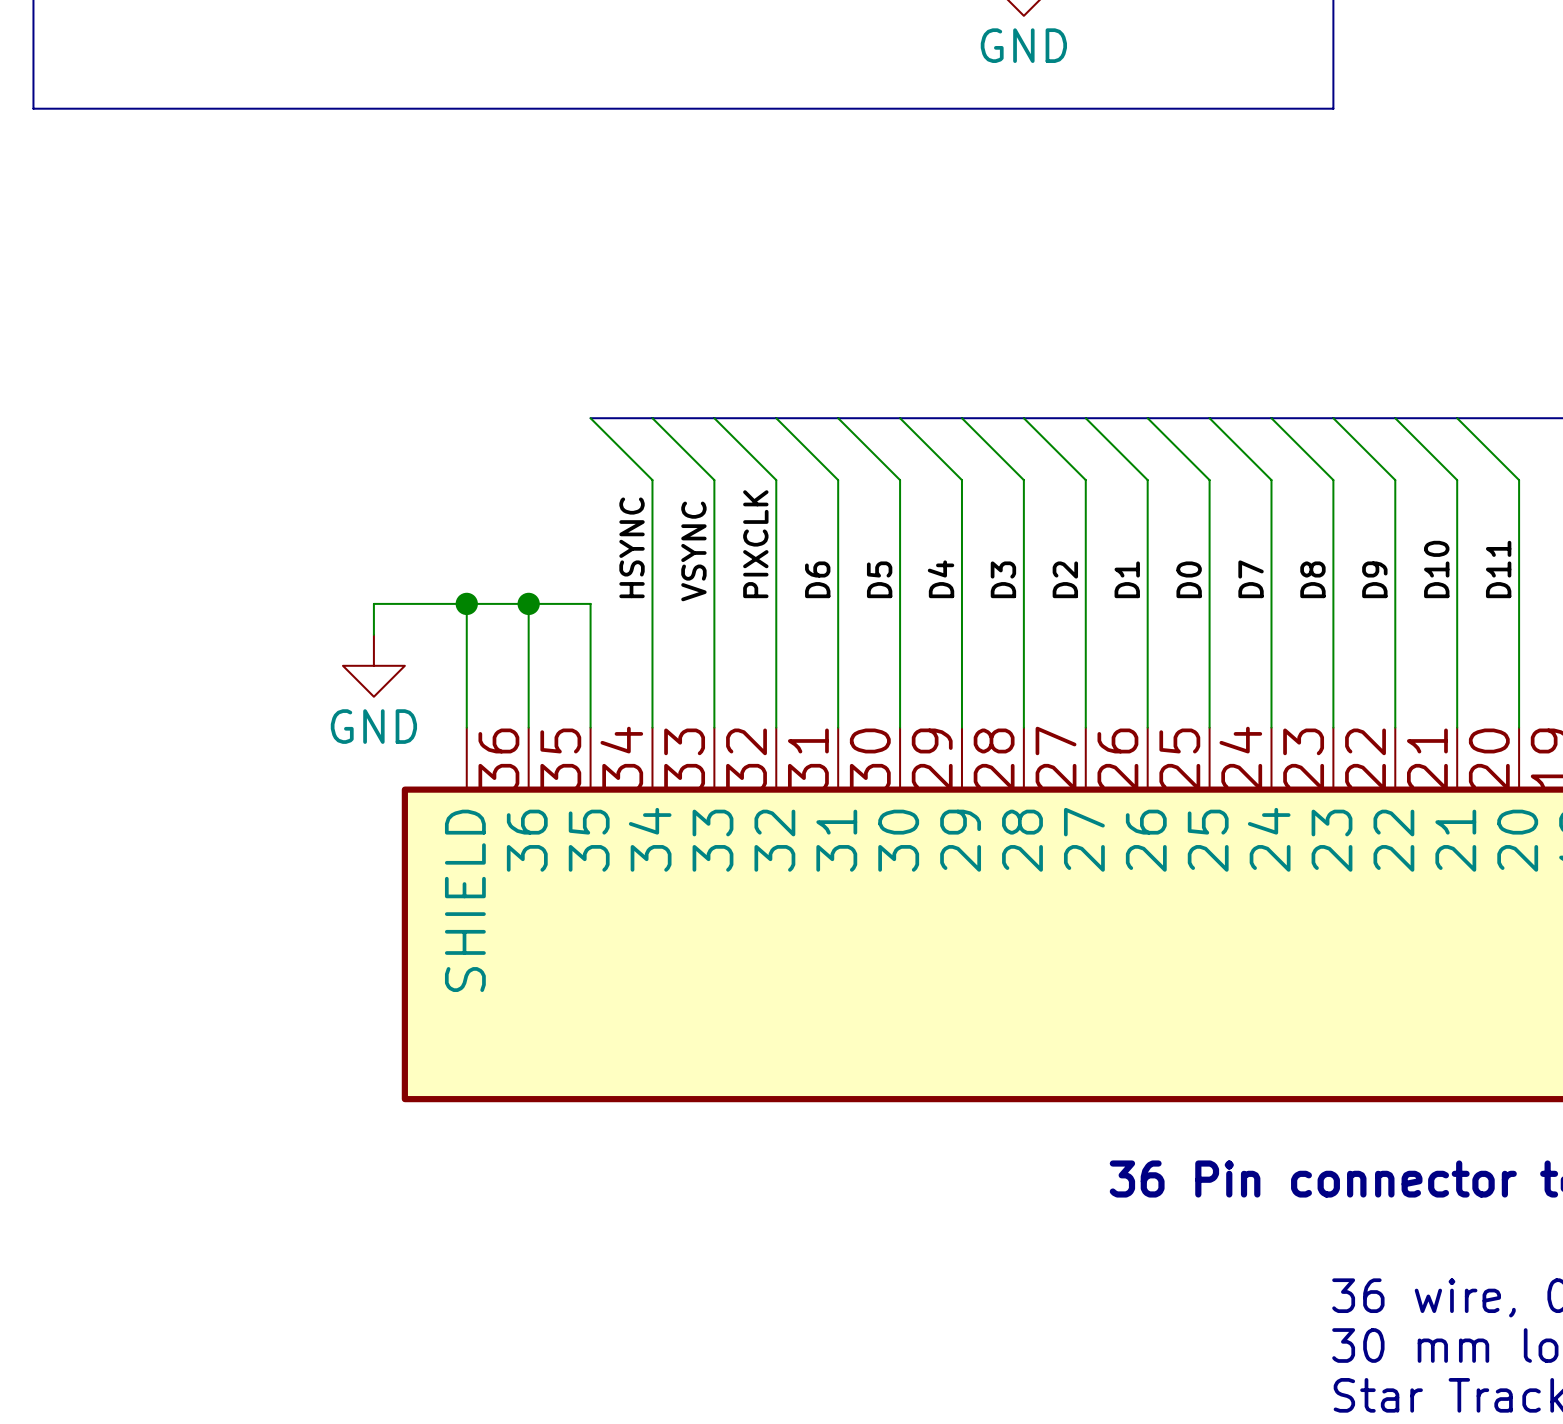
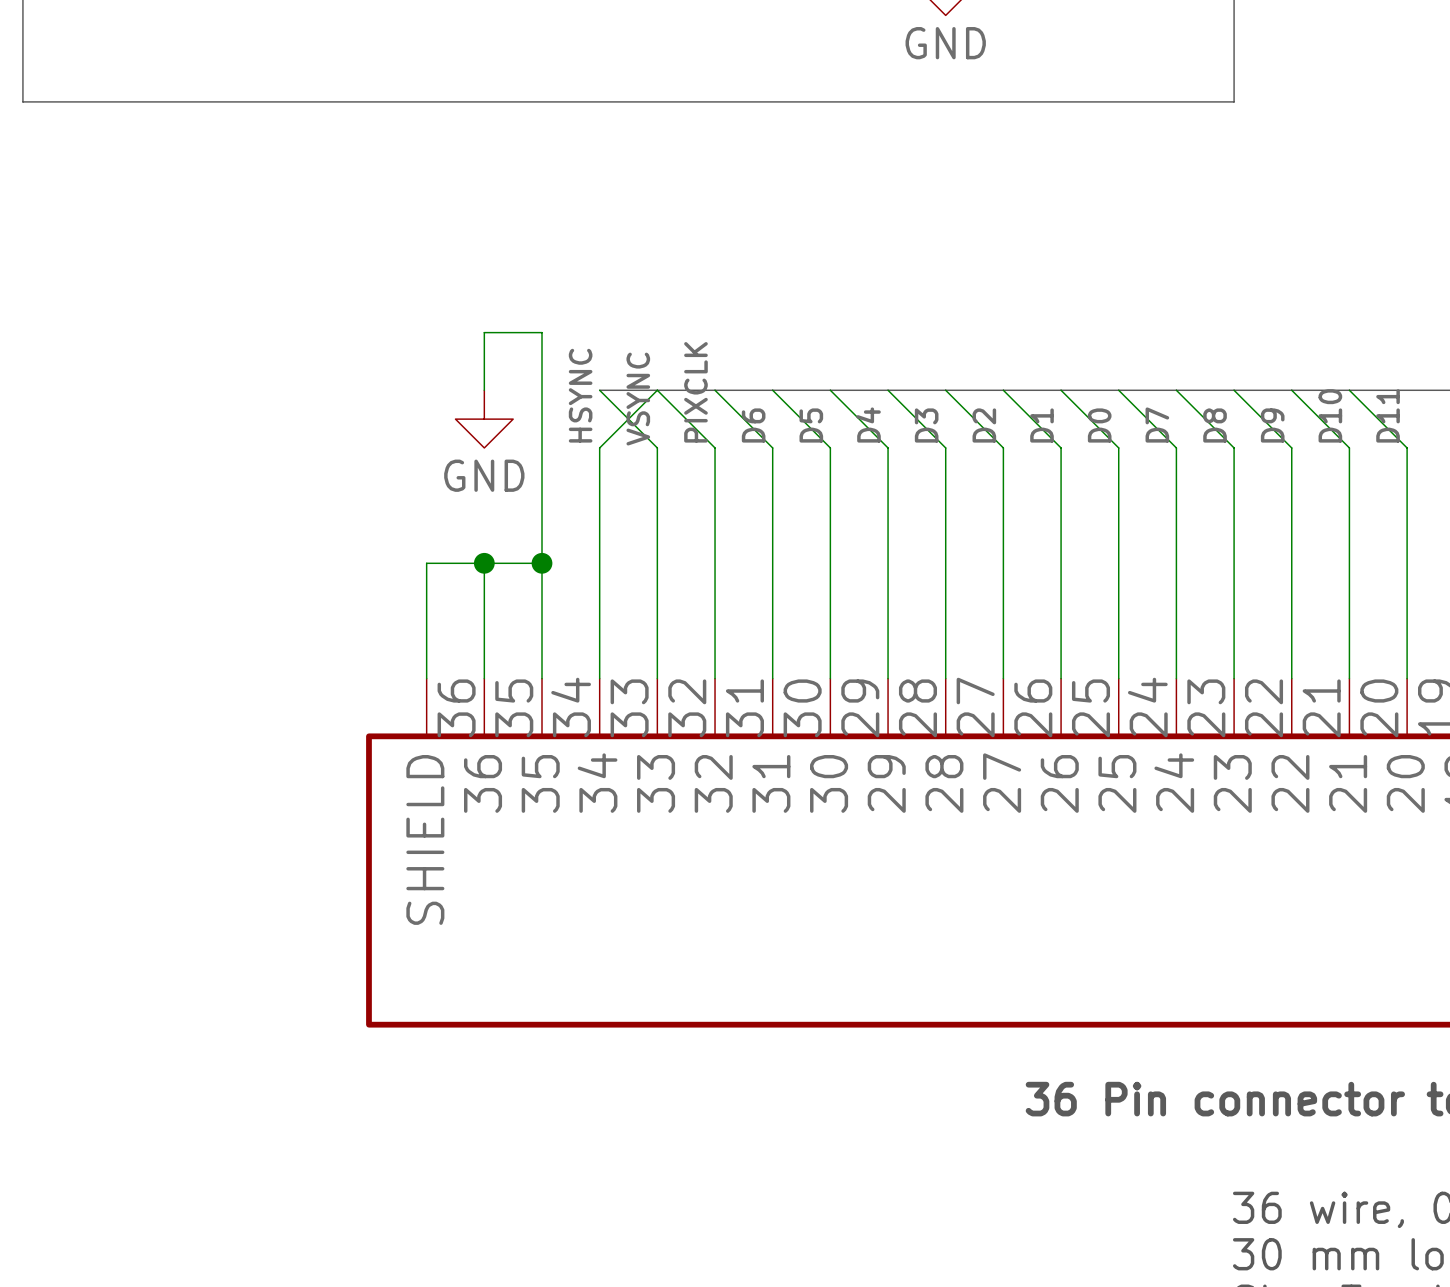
wire: none -> (484, 390) (484, 332) (542, 332) (542, 563)
wire: (590, 418) (652, 480) -> (657, 390) (599, 447)
bus: (590, 418) (652, 418) -> none
label position: PIXCLK (755, 544) -> PIXCLK (695, 392)
label position: HSYNC (632, 547) -> HSYNC (580, 395)
label position: VSYNC (693, 551) -> VSYNC (638, 399)
label position: D10 (1436, 569) -> D10 (1330, 415)
label position: D11 (1498, 569) -> D11 (1388, 415)
label position: D6 (817, 579) -> D6 (753, 425)
label position: D5 (879, 579) -> D5 (811, 425)
label position: D4 (941, 579) -> D4 (868, 425)
label position: D3 (1003, 579) -> D3 (926, 425)
label position: D2 (1065, 579) -> D2 (984, 425)
label position: D1 (1127, 579) -> D1 (1042, 425)
label position: D0 (1189, 579) -> D0 (1099, 425)
label position: D7 (1251, 579) -> D7 (1157, 425)
label position: D8 (1312, 579) -> D8 (1215, 425)
label position: D9 (1374, 579) -> D9 (1272, 425)
wire: (466, 603) (373, 603) (373, 634) -> none
junction position: (466, 603) -> (542, 563)
power symbol position: GND (373, 665) -> GND (484, 419)

